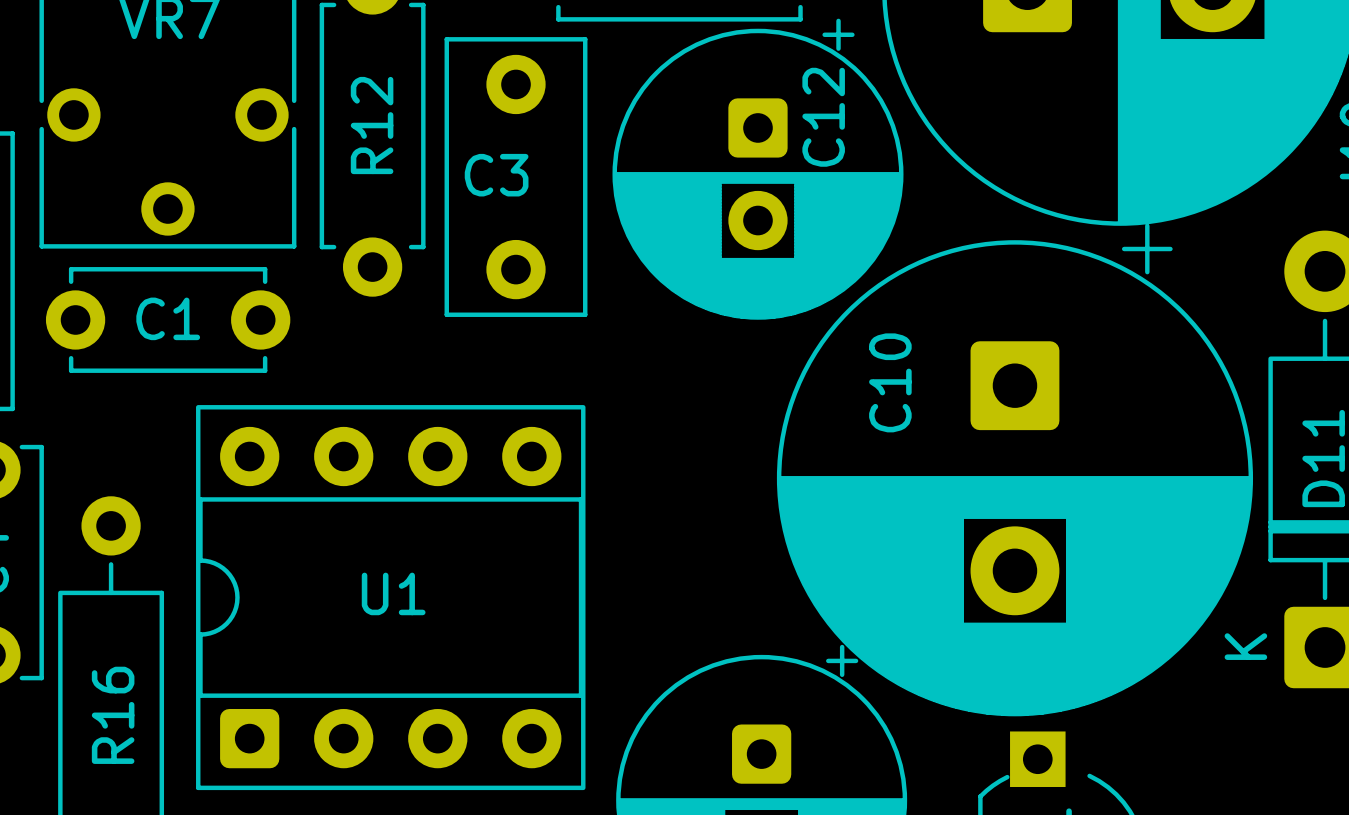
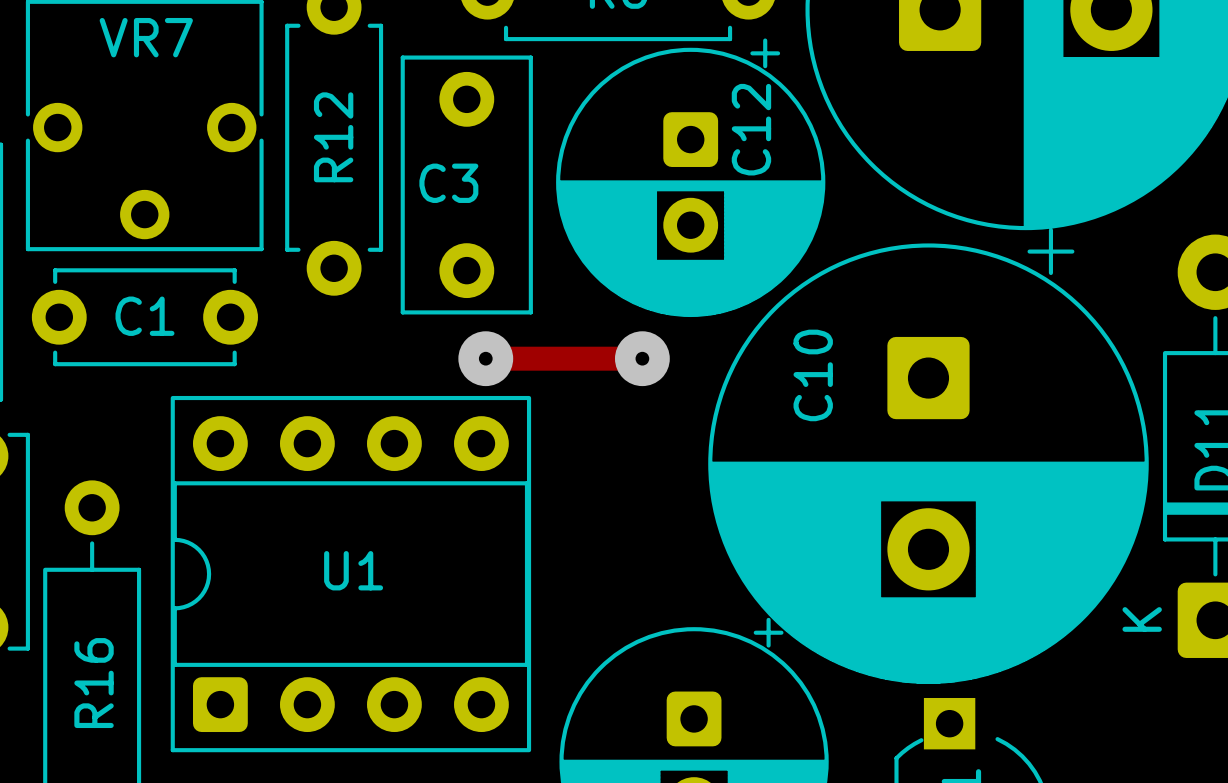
track: none -> (485, 358) (642, 358)
via: none -> (485, 358)
via: none -> (642, 358)

